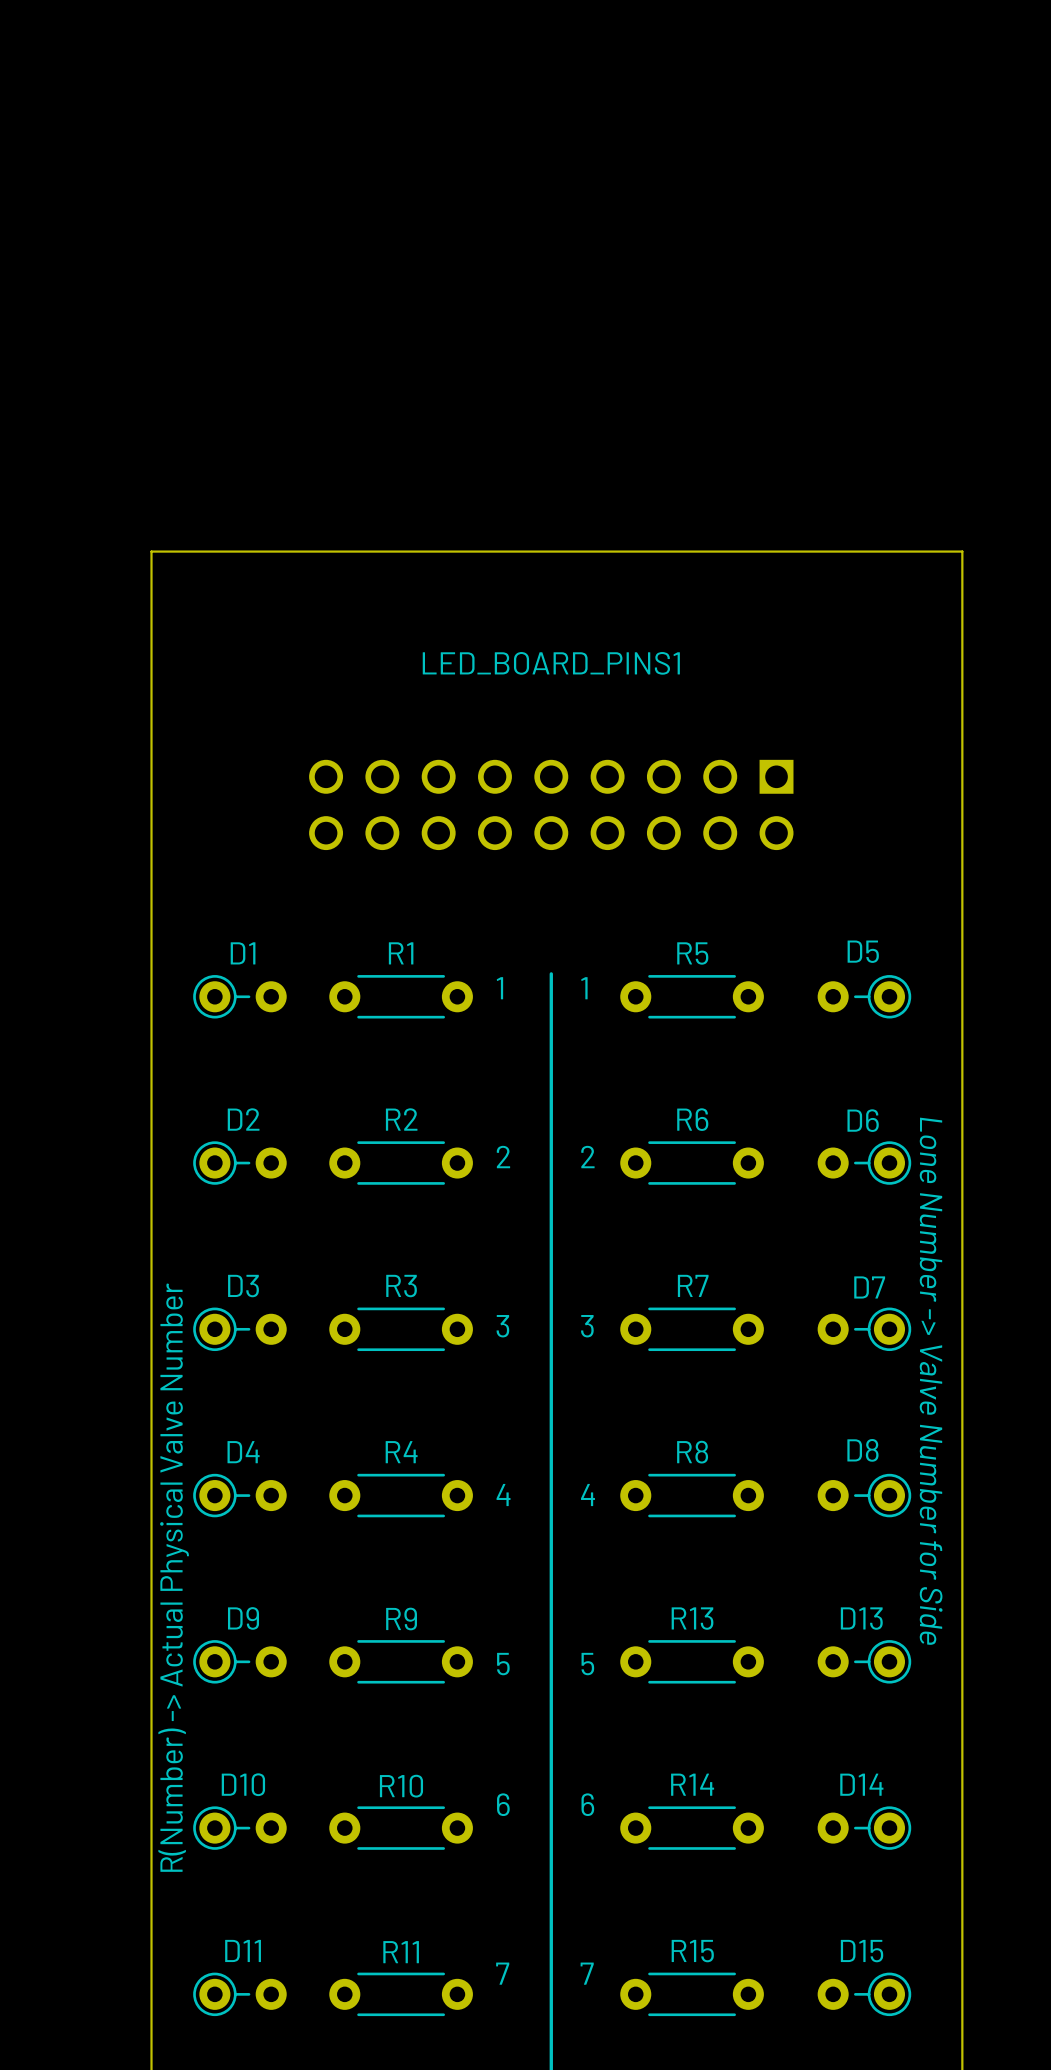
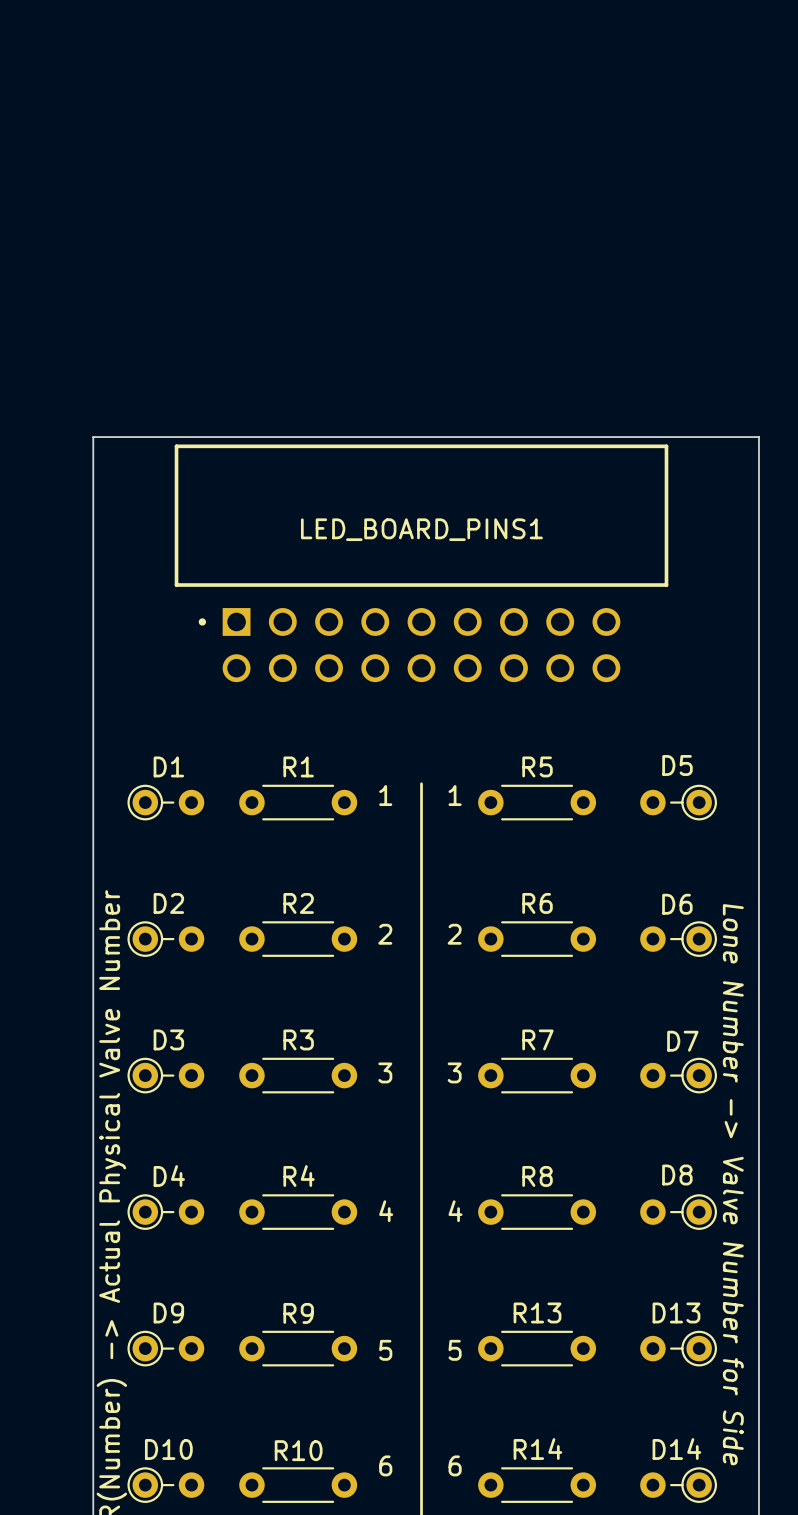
LED_BOARD_PINS1 side: bottom (551, 804) -> top (421, 563)

